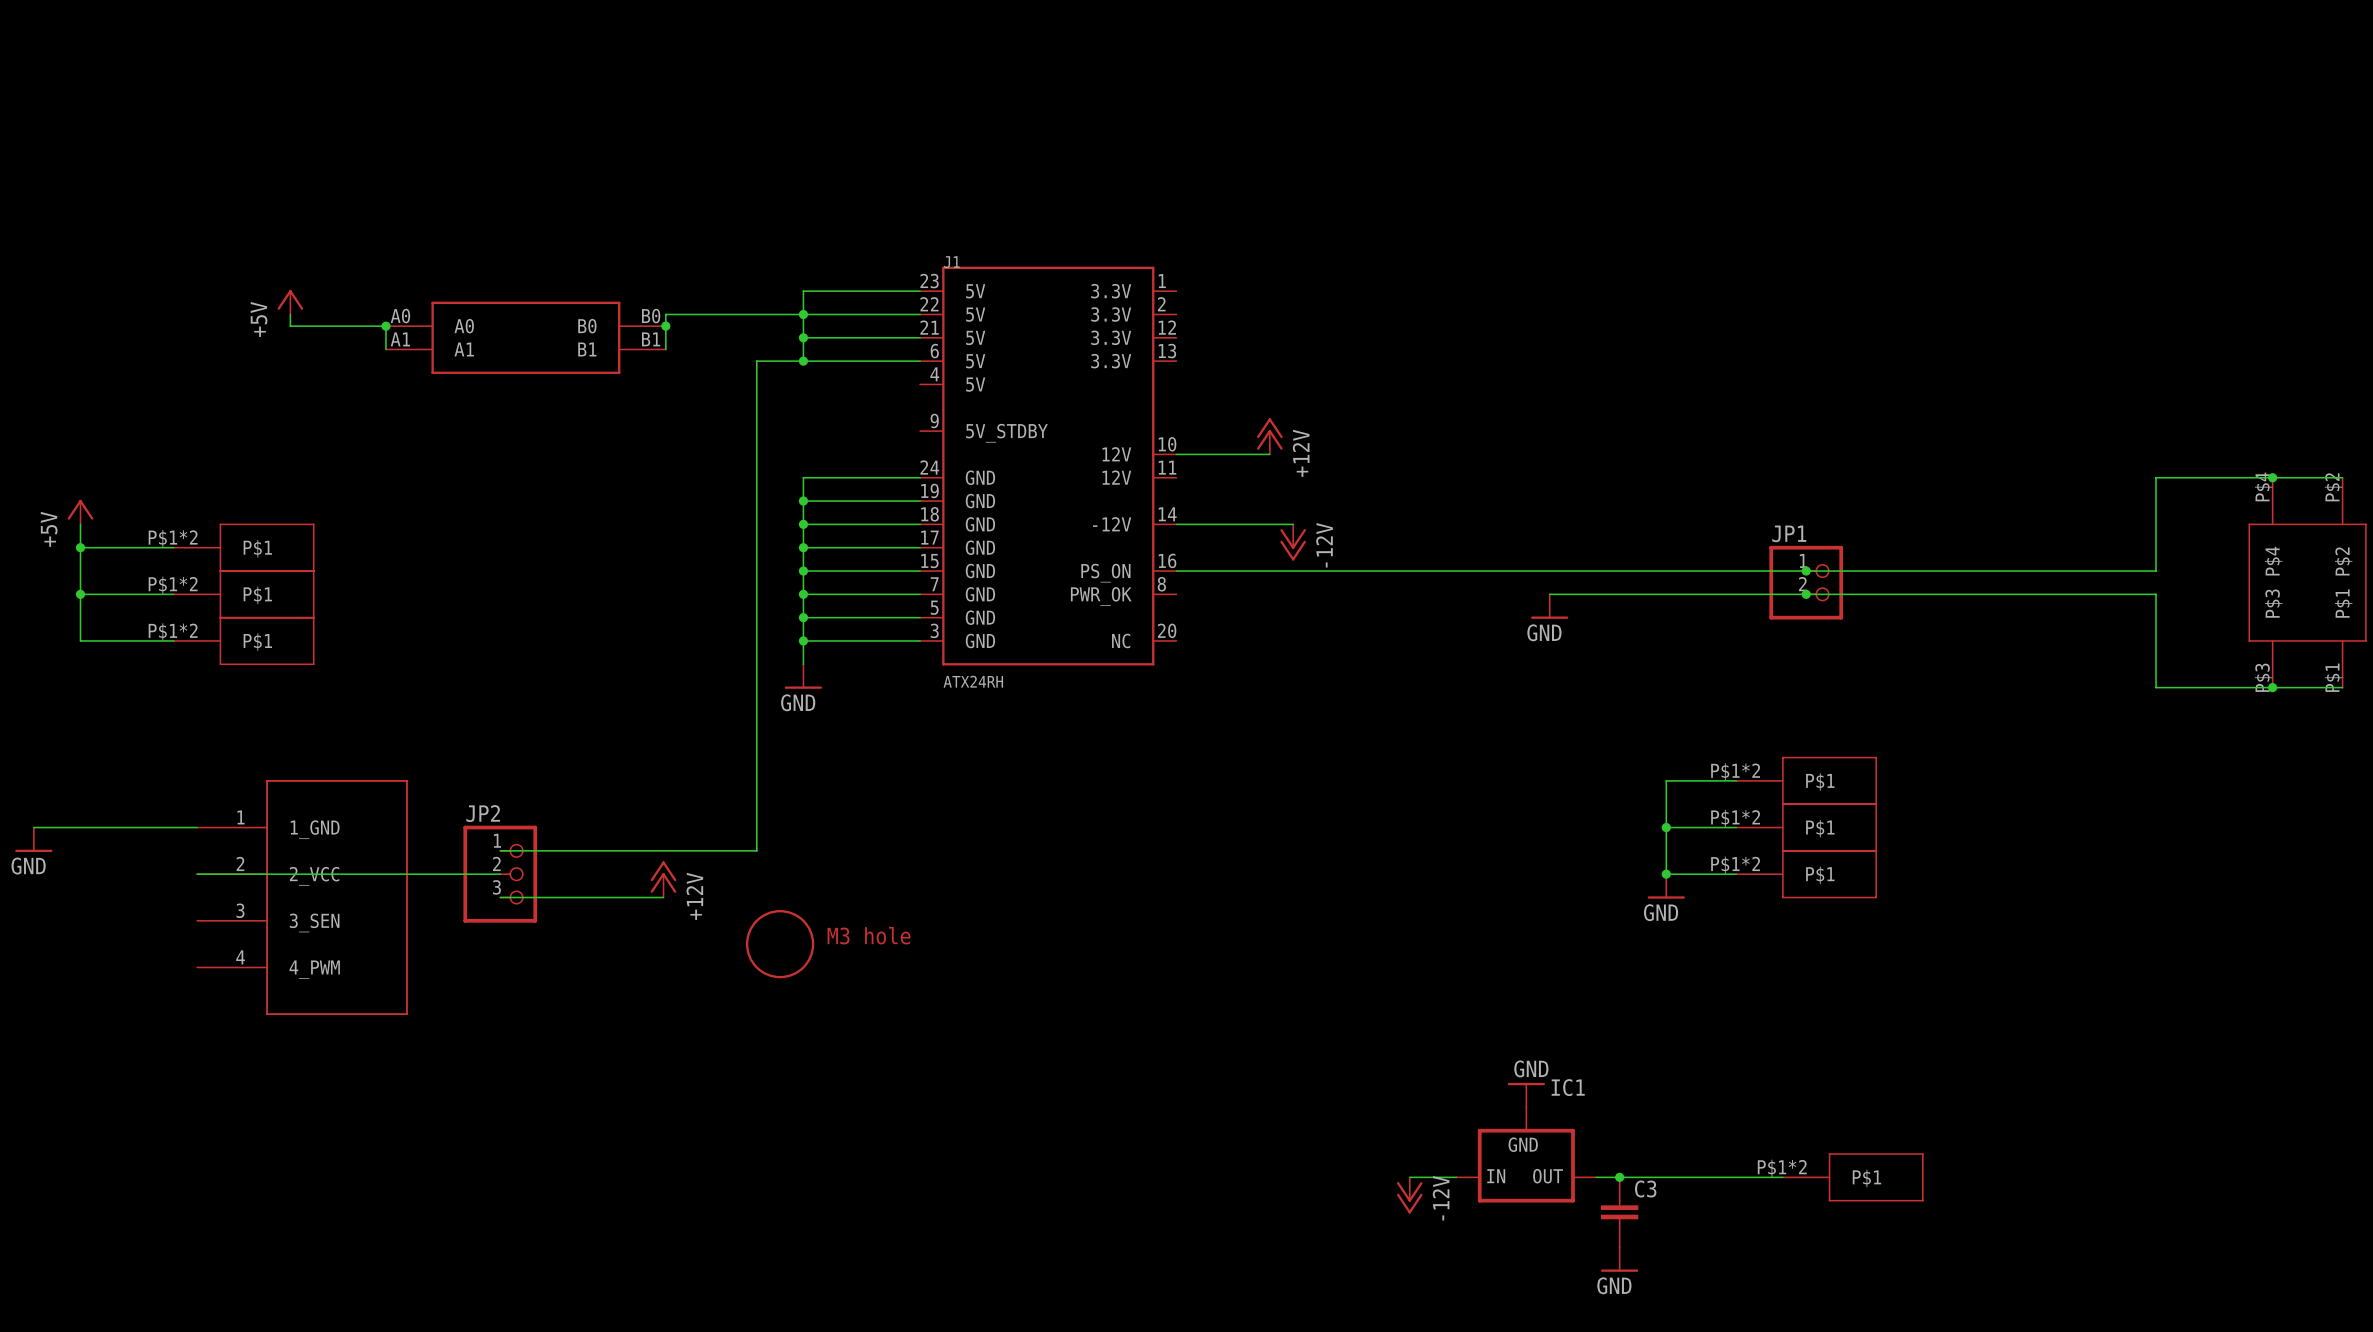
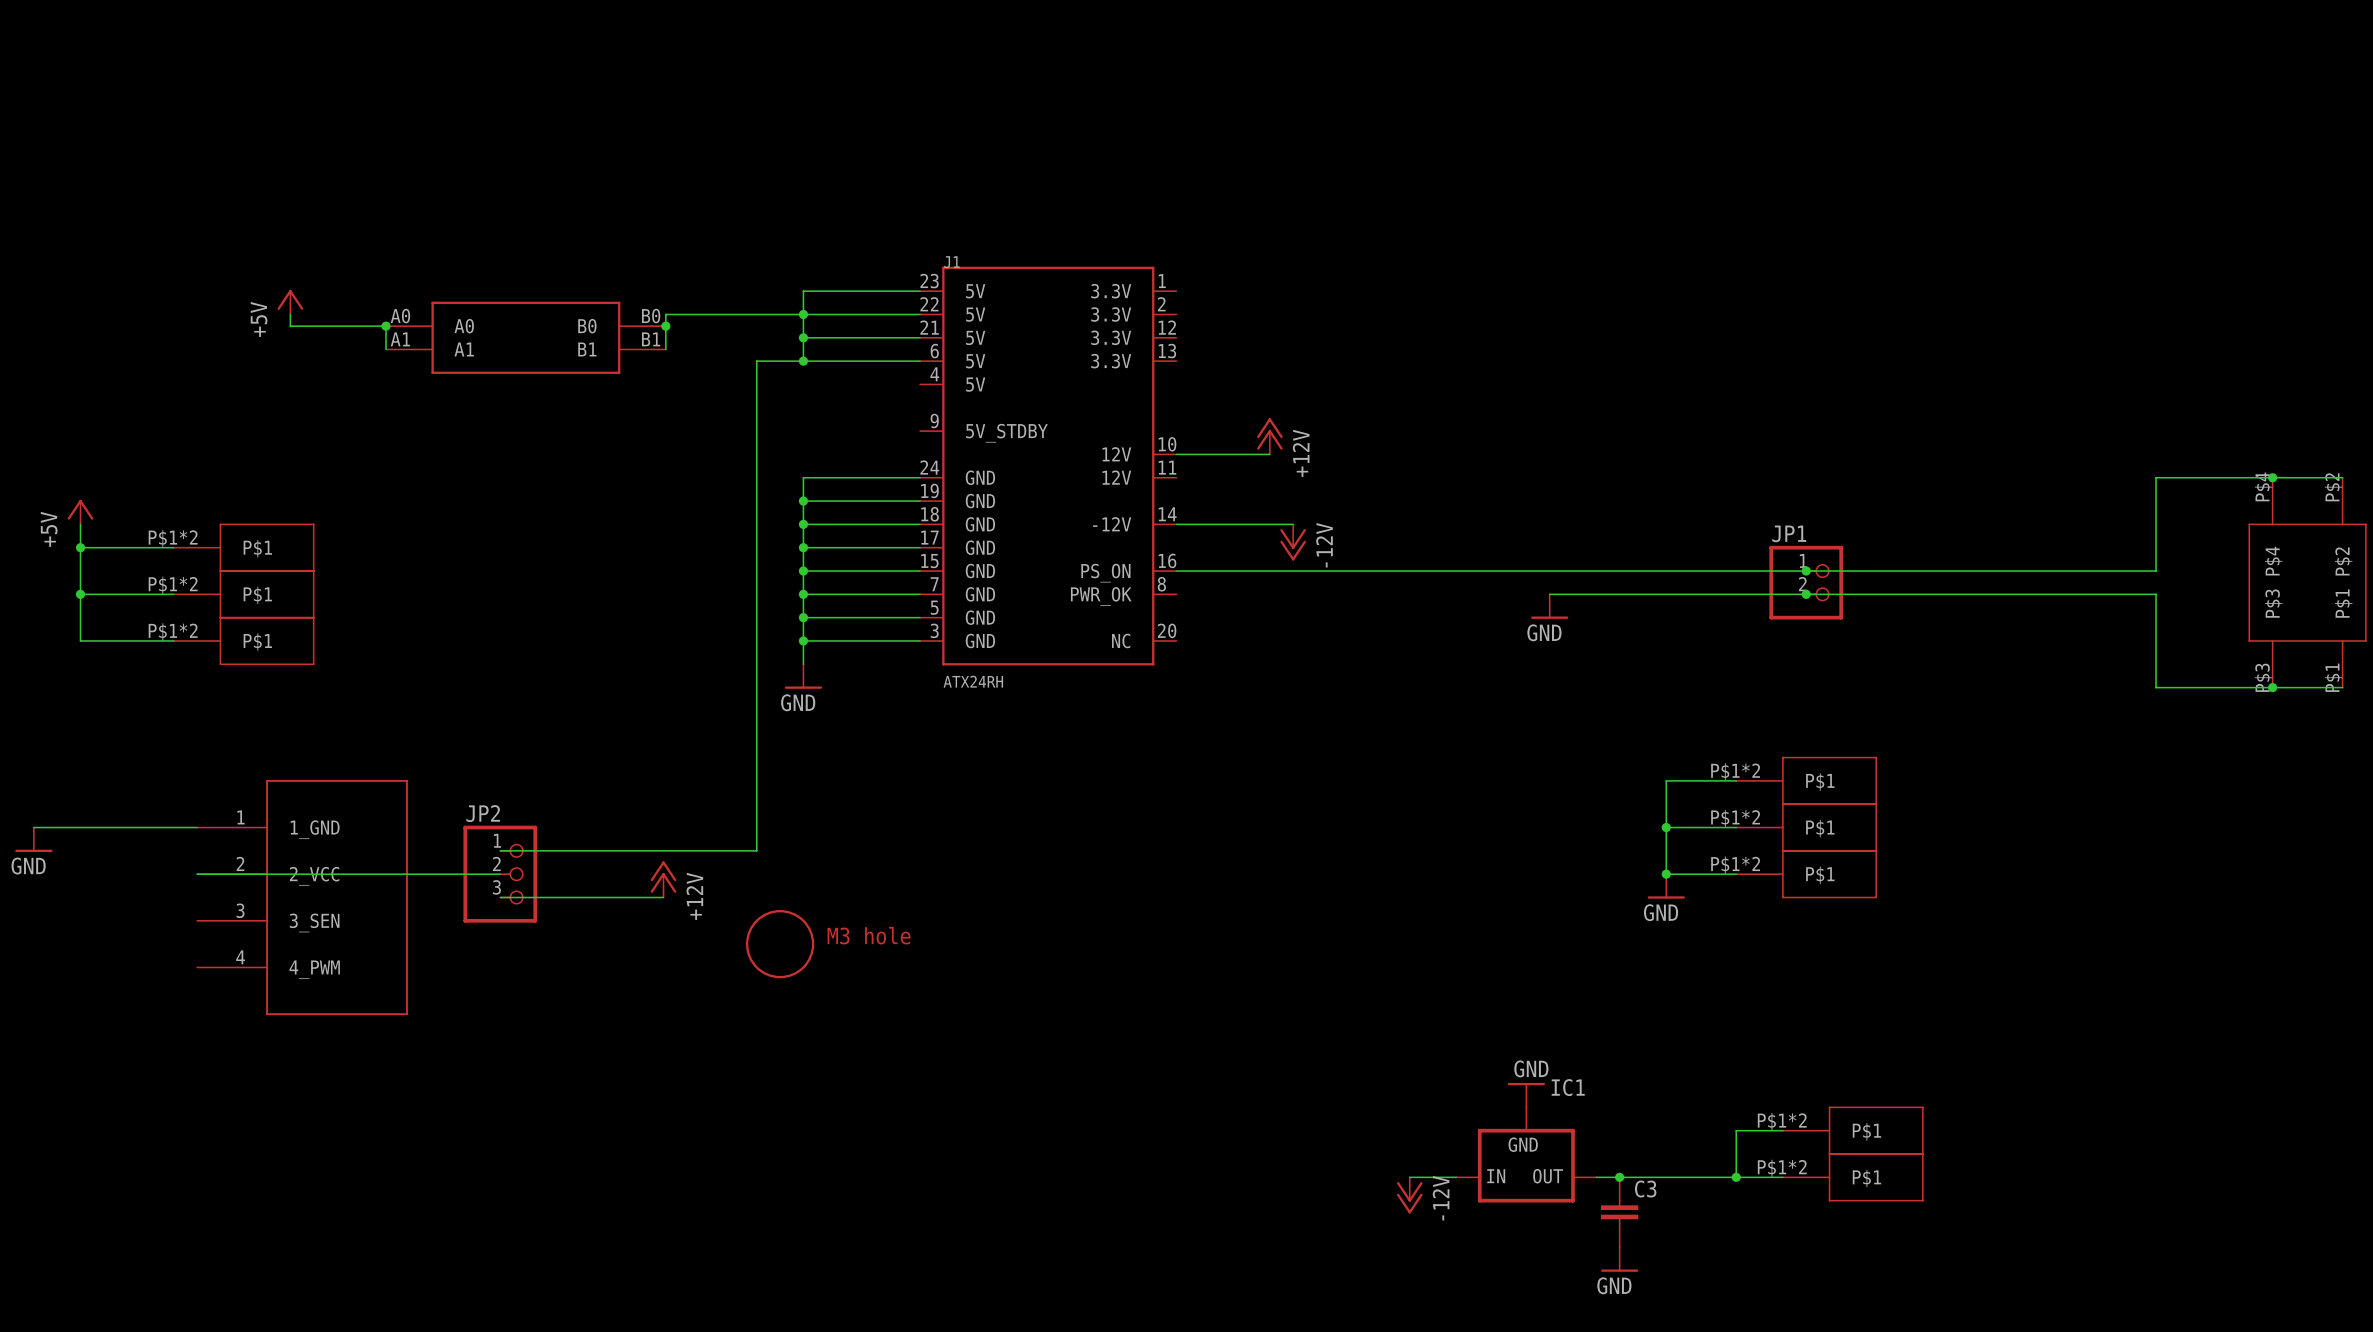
wire: none -> (1782, 1130) (1736, 1130) (1736, 1177)
part: none -> (1853, 1130)
junction: none -> (1736, 1177)

